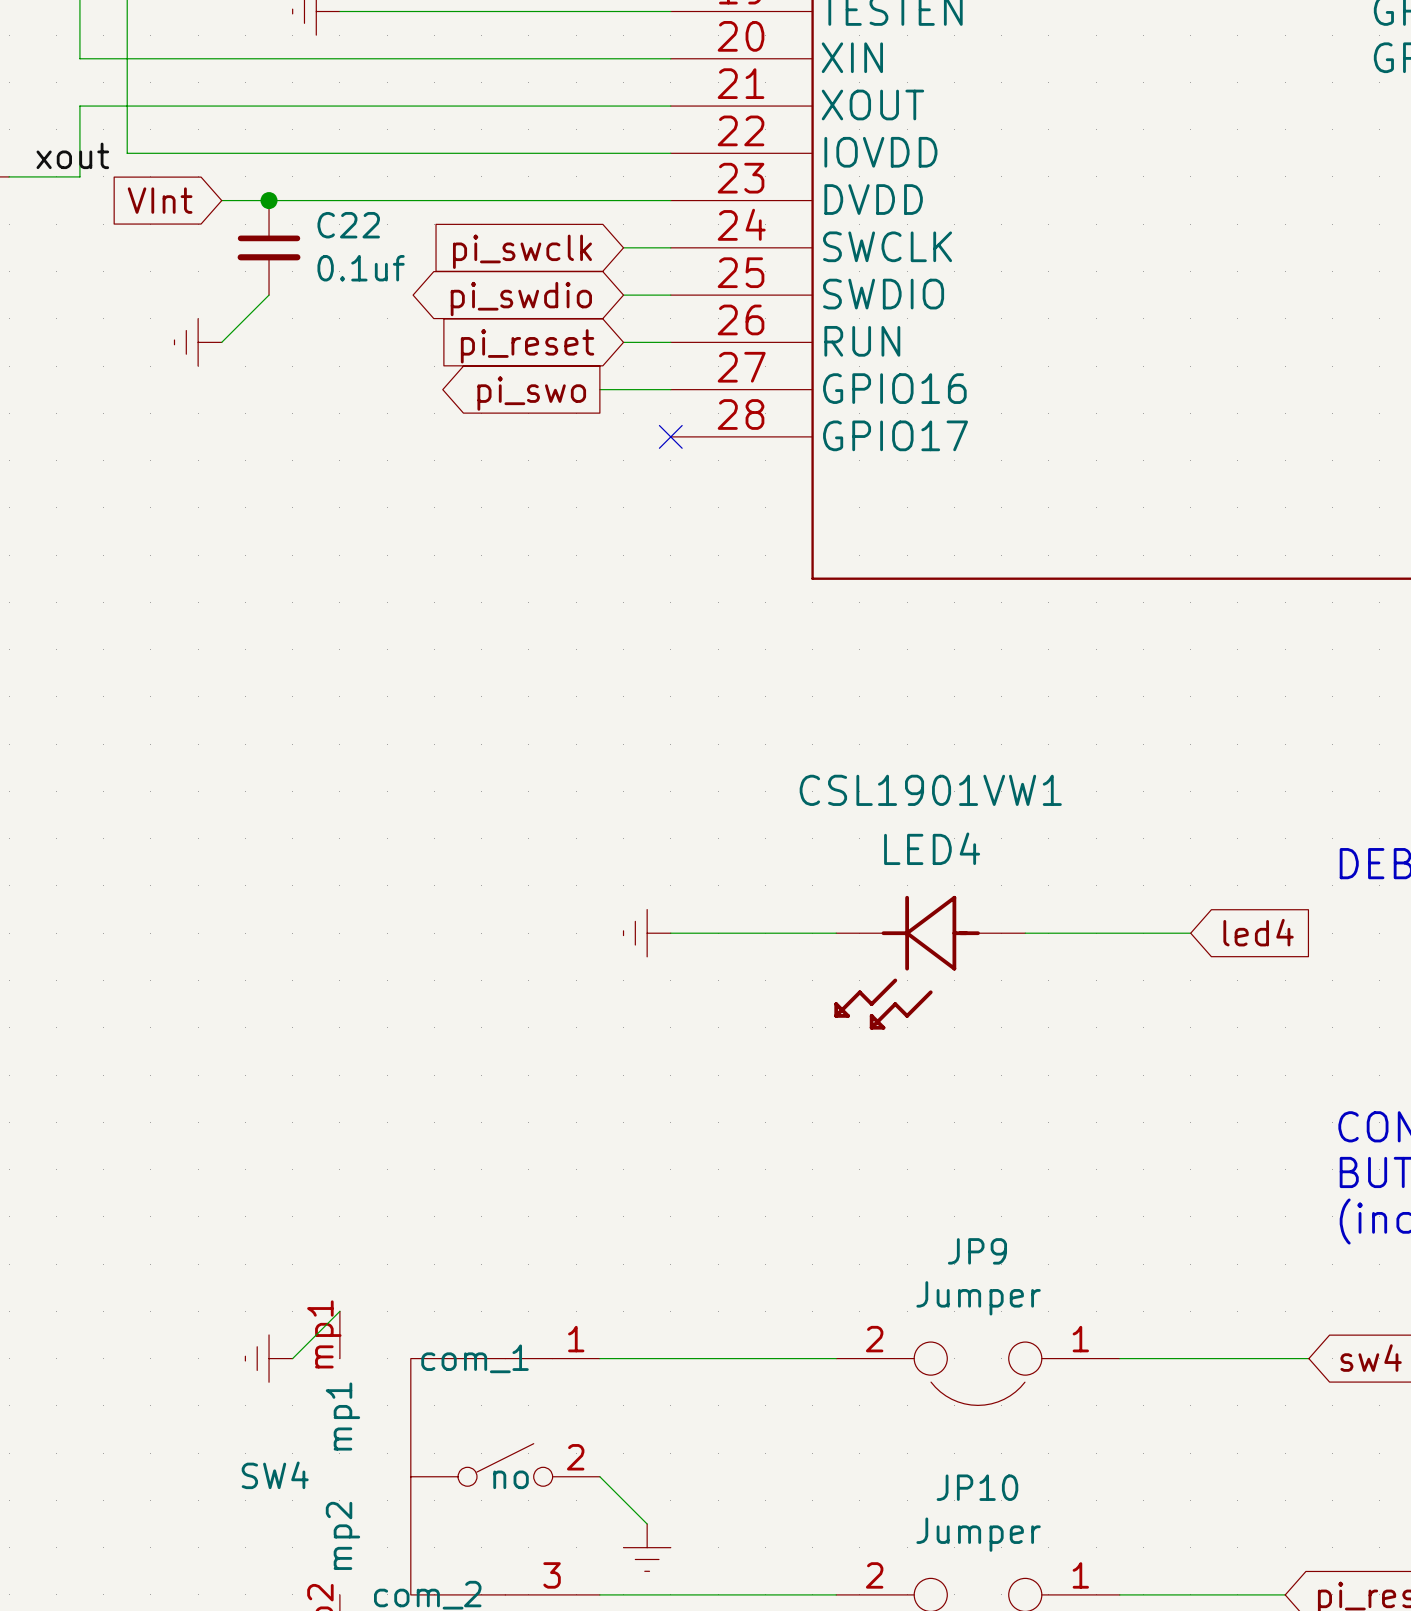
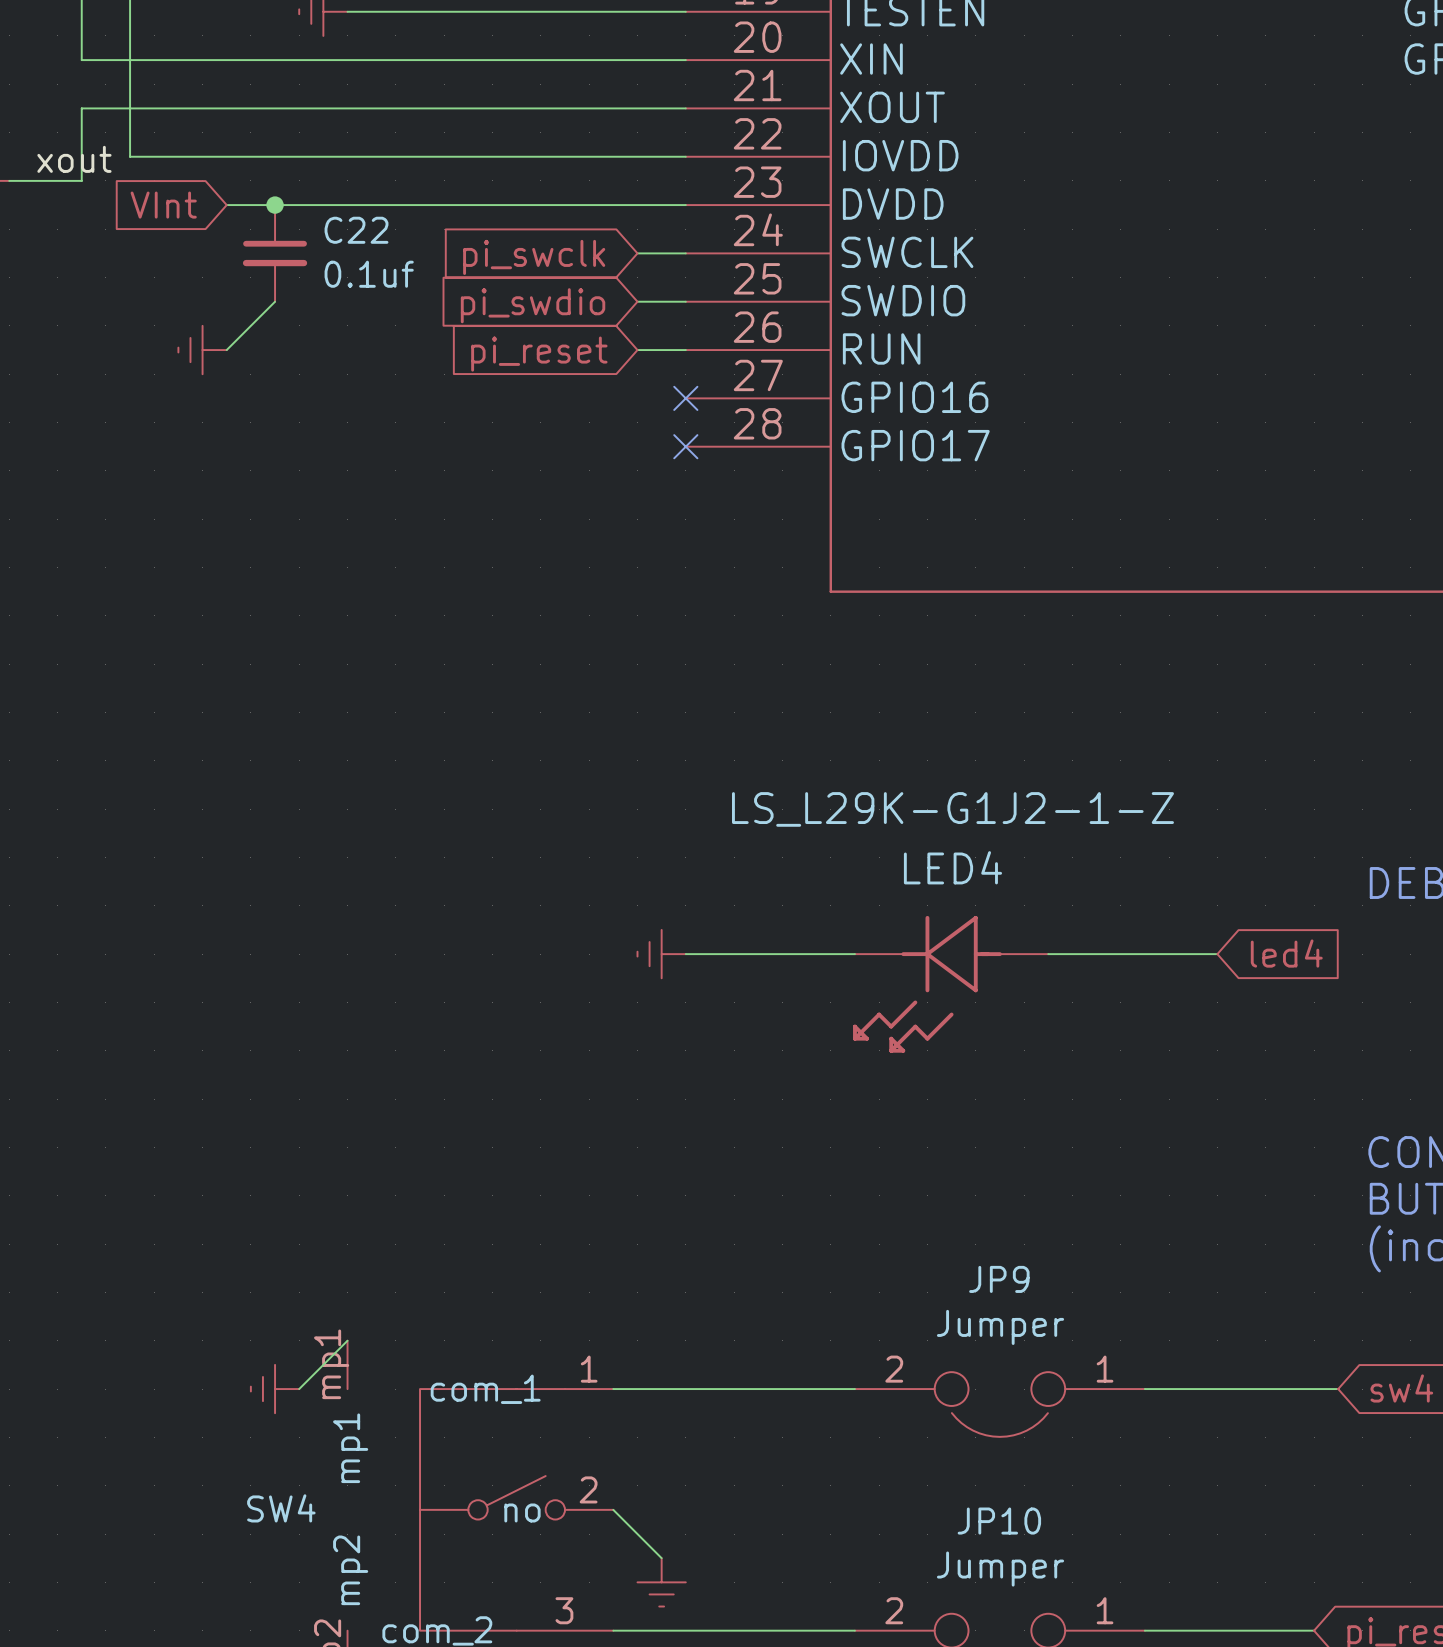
global label shape: bidirectional (521, 299) -> input (533, 305)
wire: (599, 389) (670, 389) -> none
no-connect mark: none -> (685, 398)
global label: pi_swo (531, 393) -> none
LED4 value: CSL1901VW1 (930, 790) -> LS_L29K-G1J2-1-Z (952, 809)

